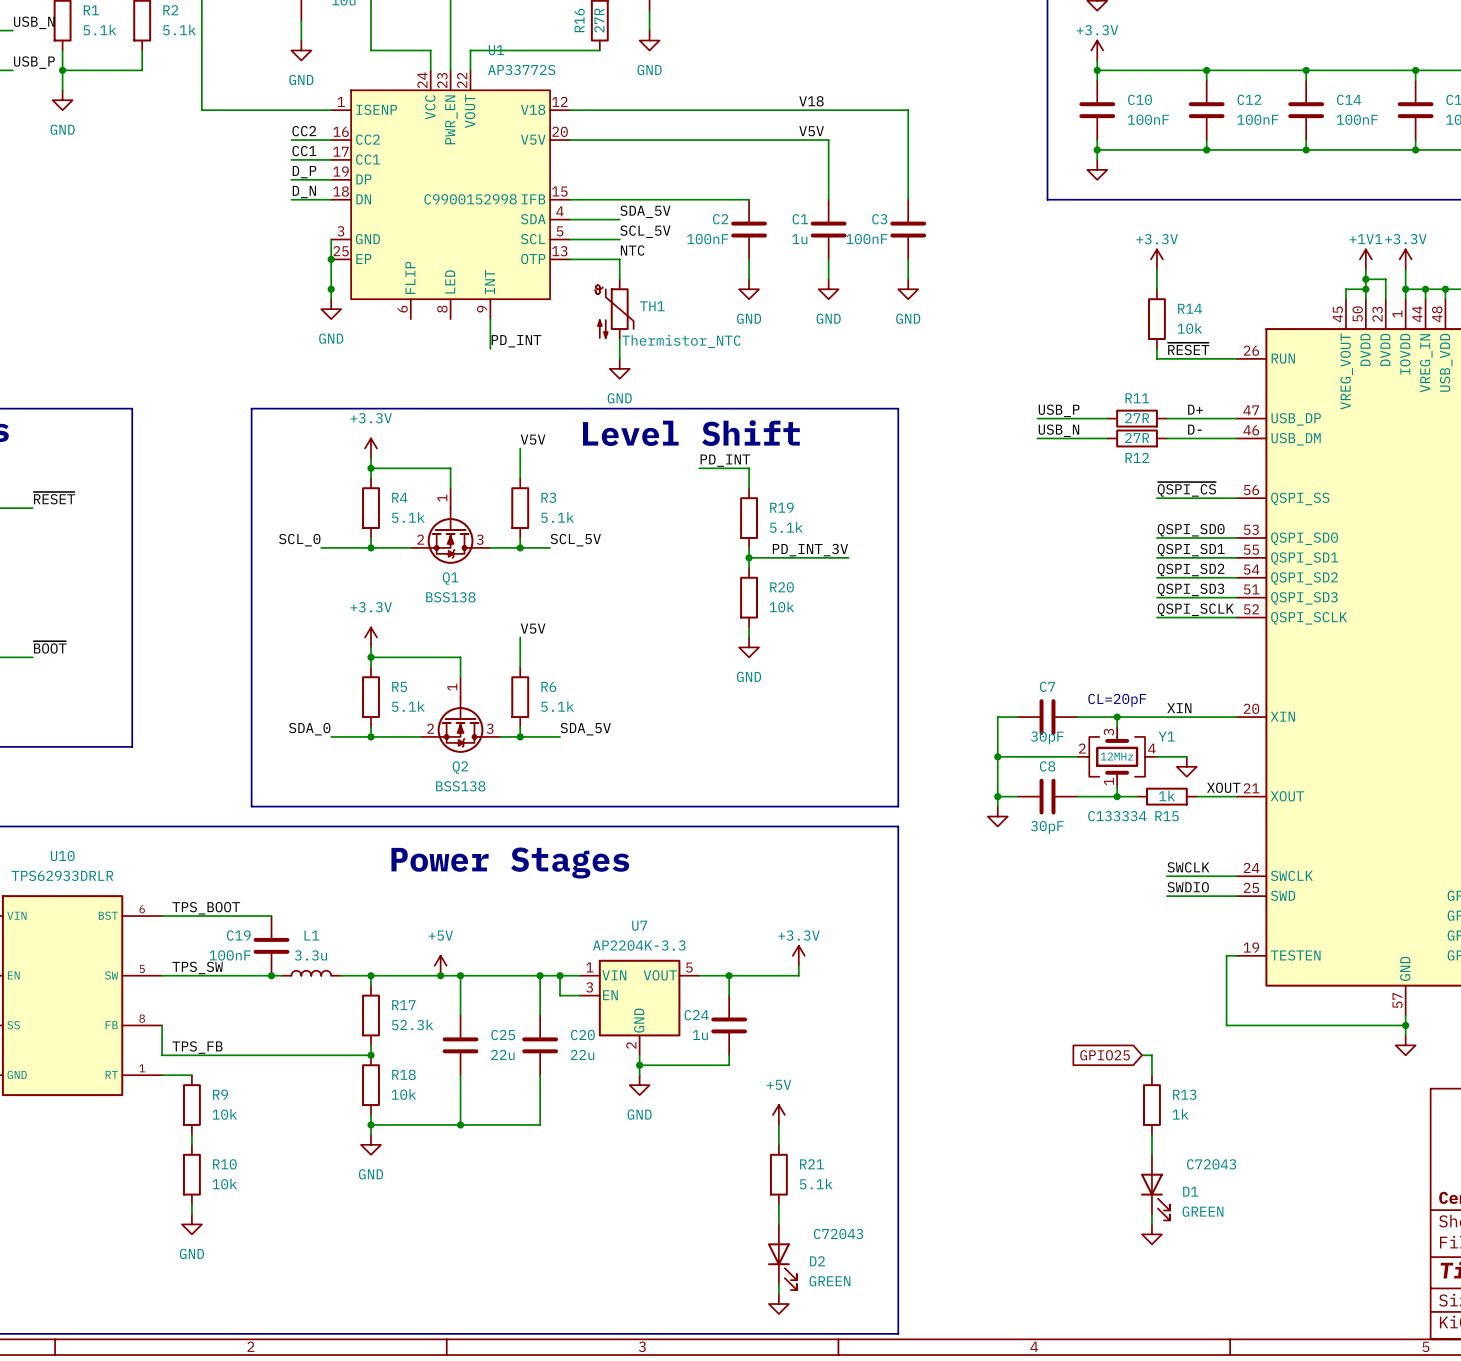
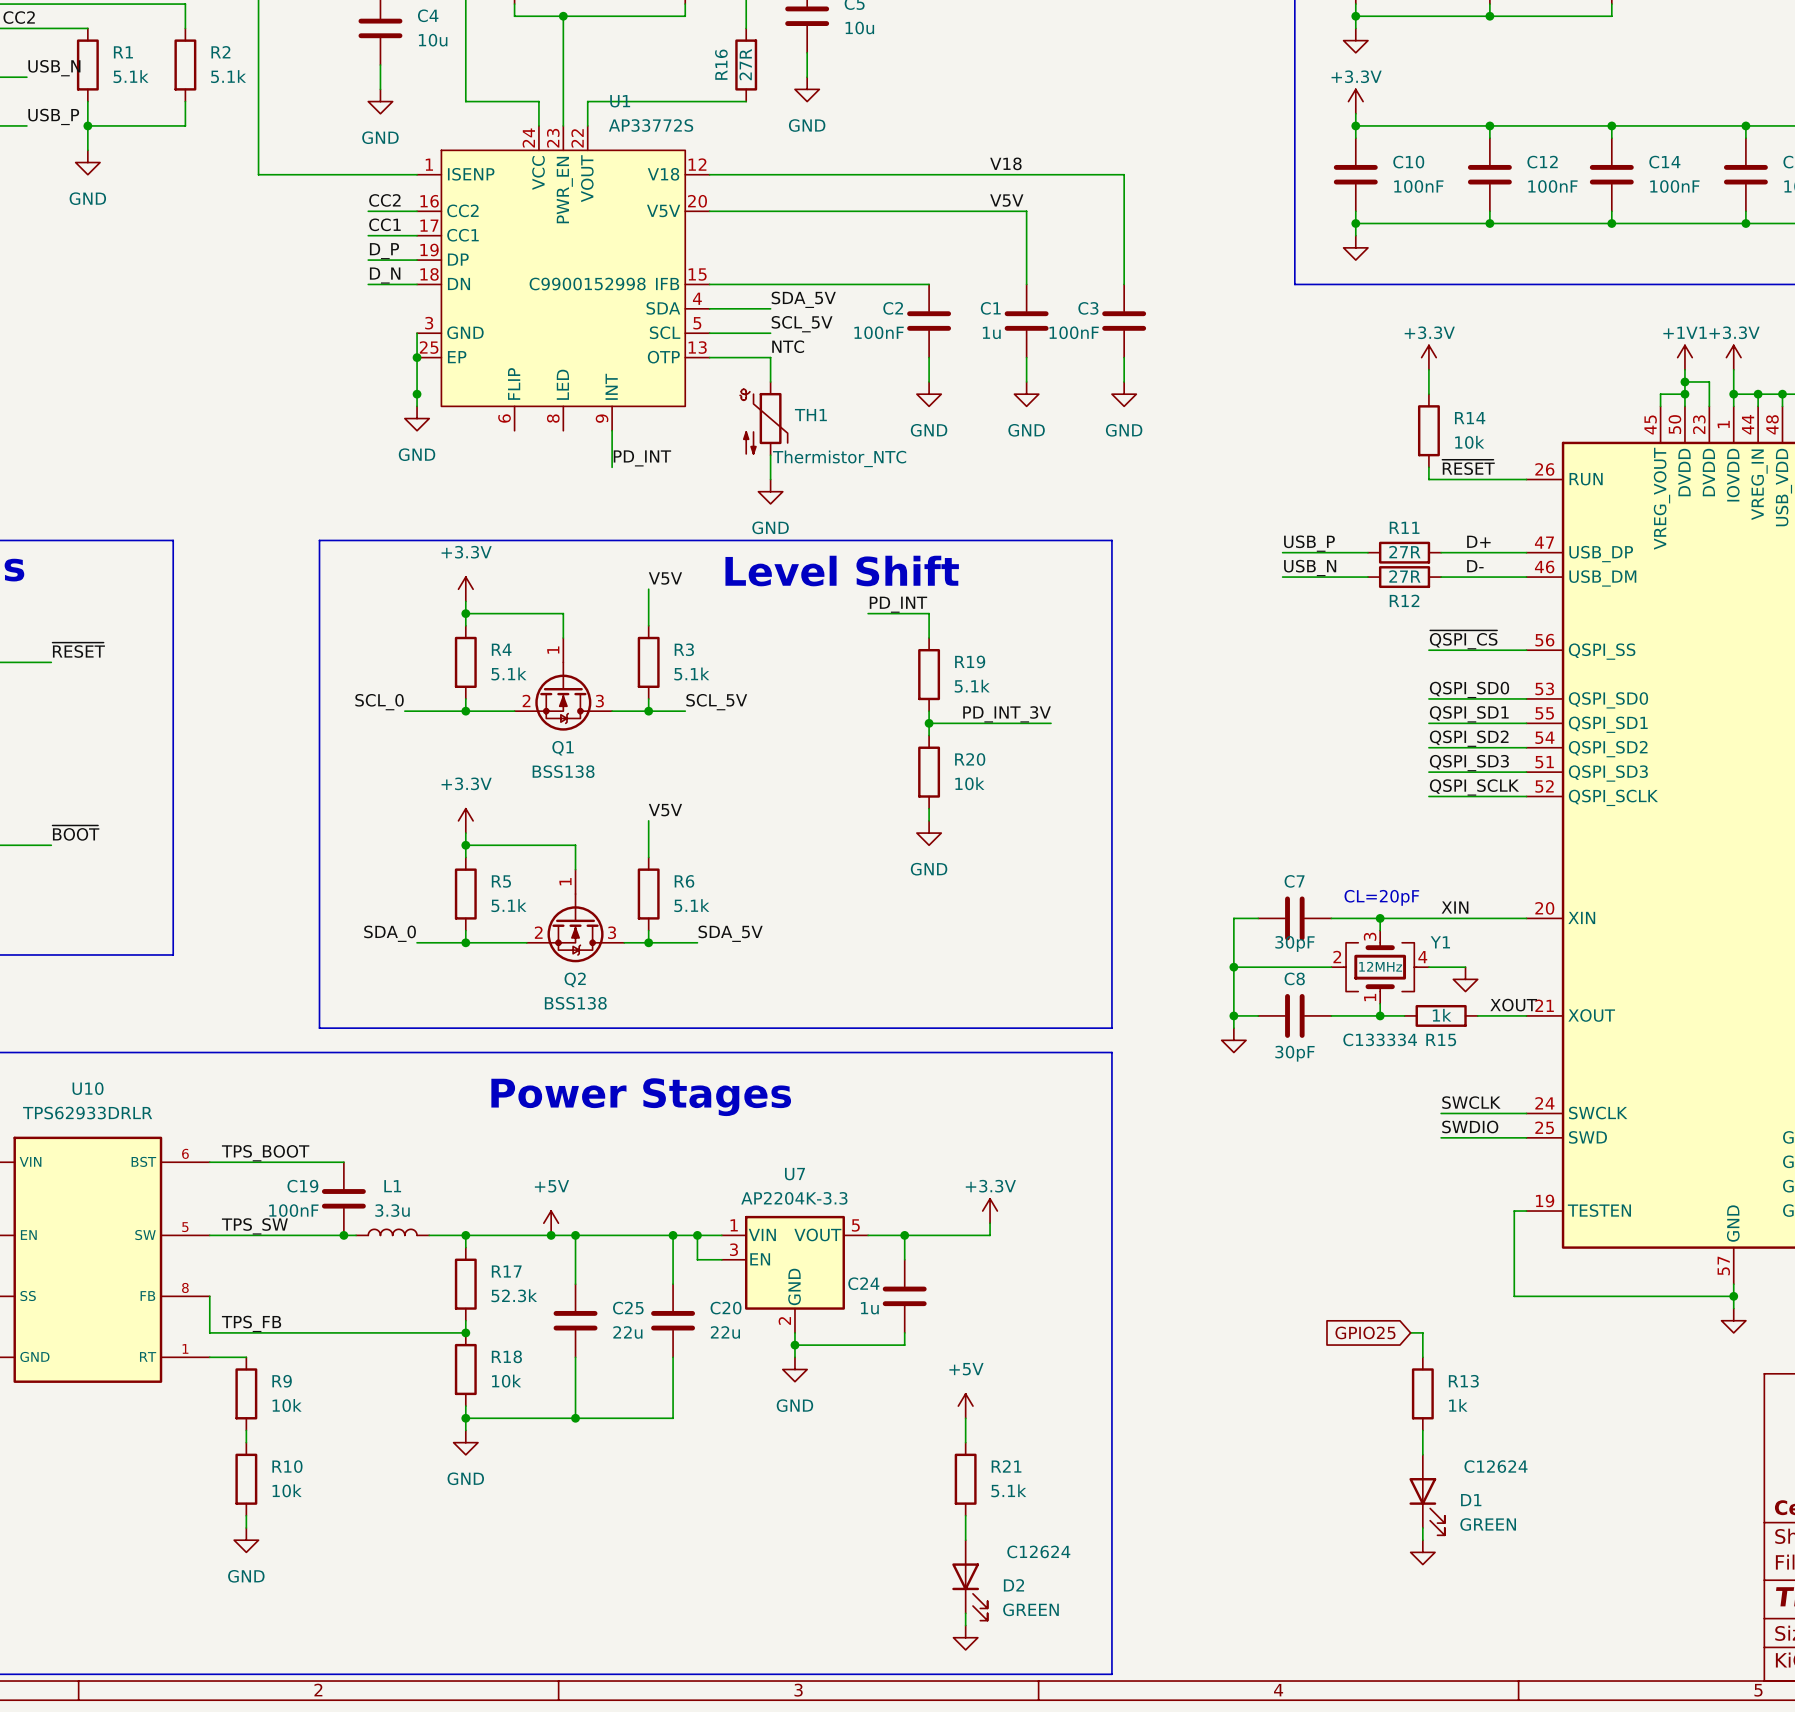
D1 text: C72043 (1211, 1164) -> C12624 (1495, 1466)
D2 text: C72043 (838, 1234) -> C12624 (1038, 1551)

